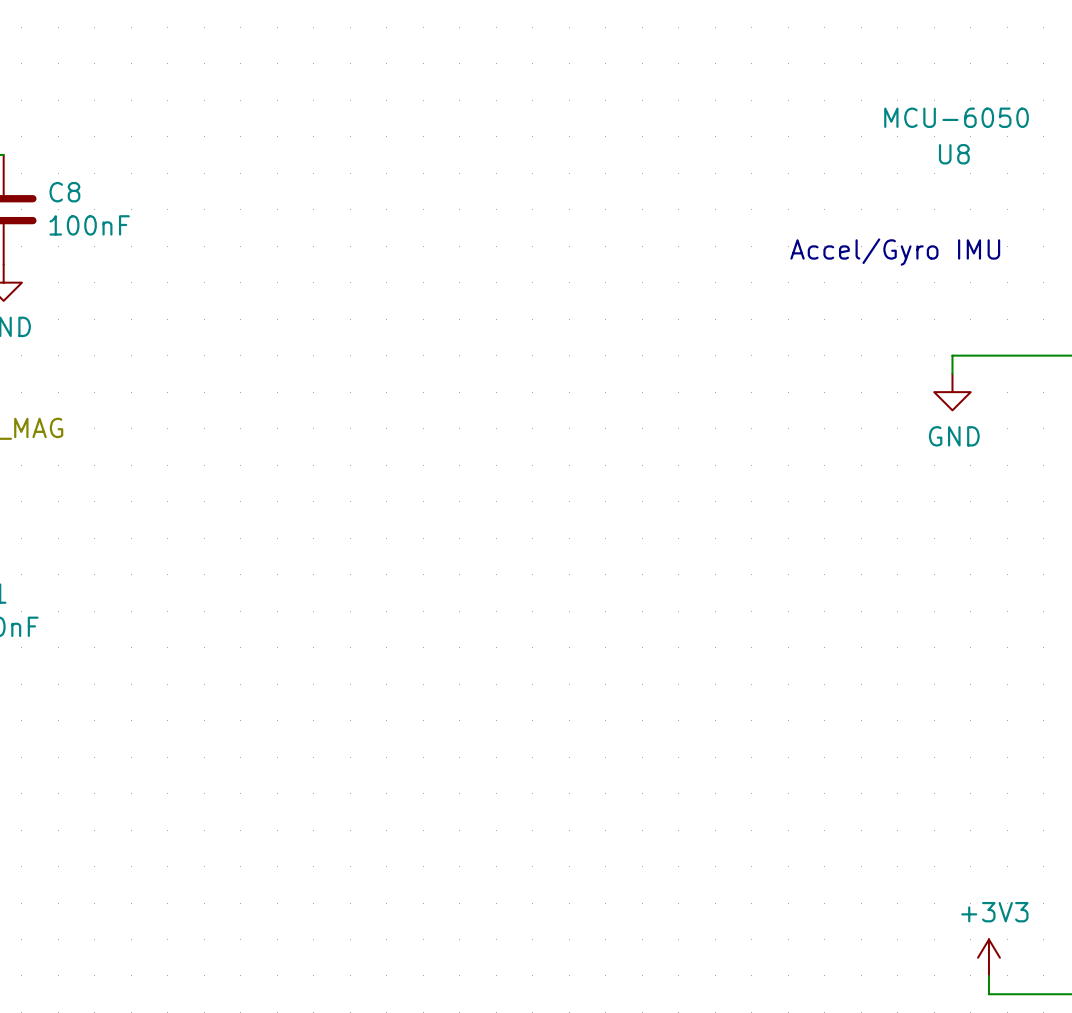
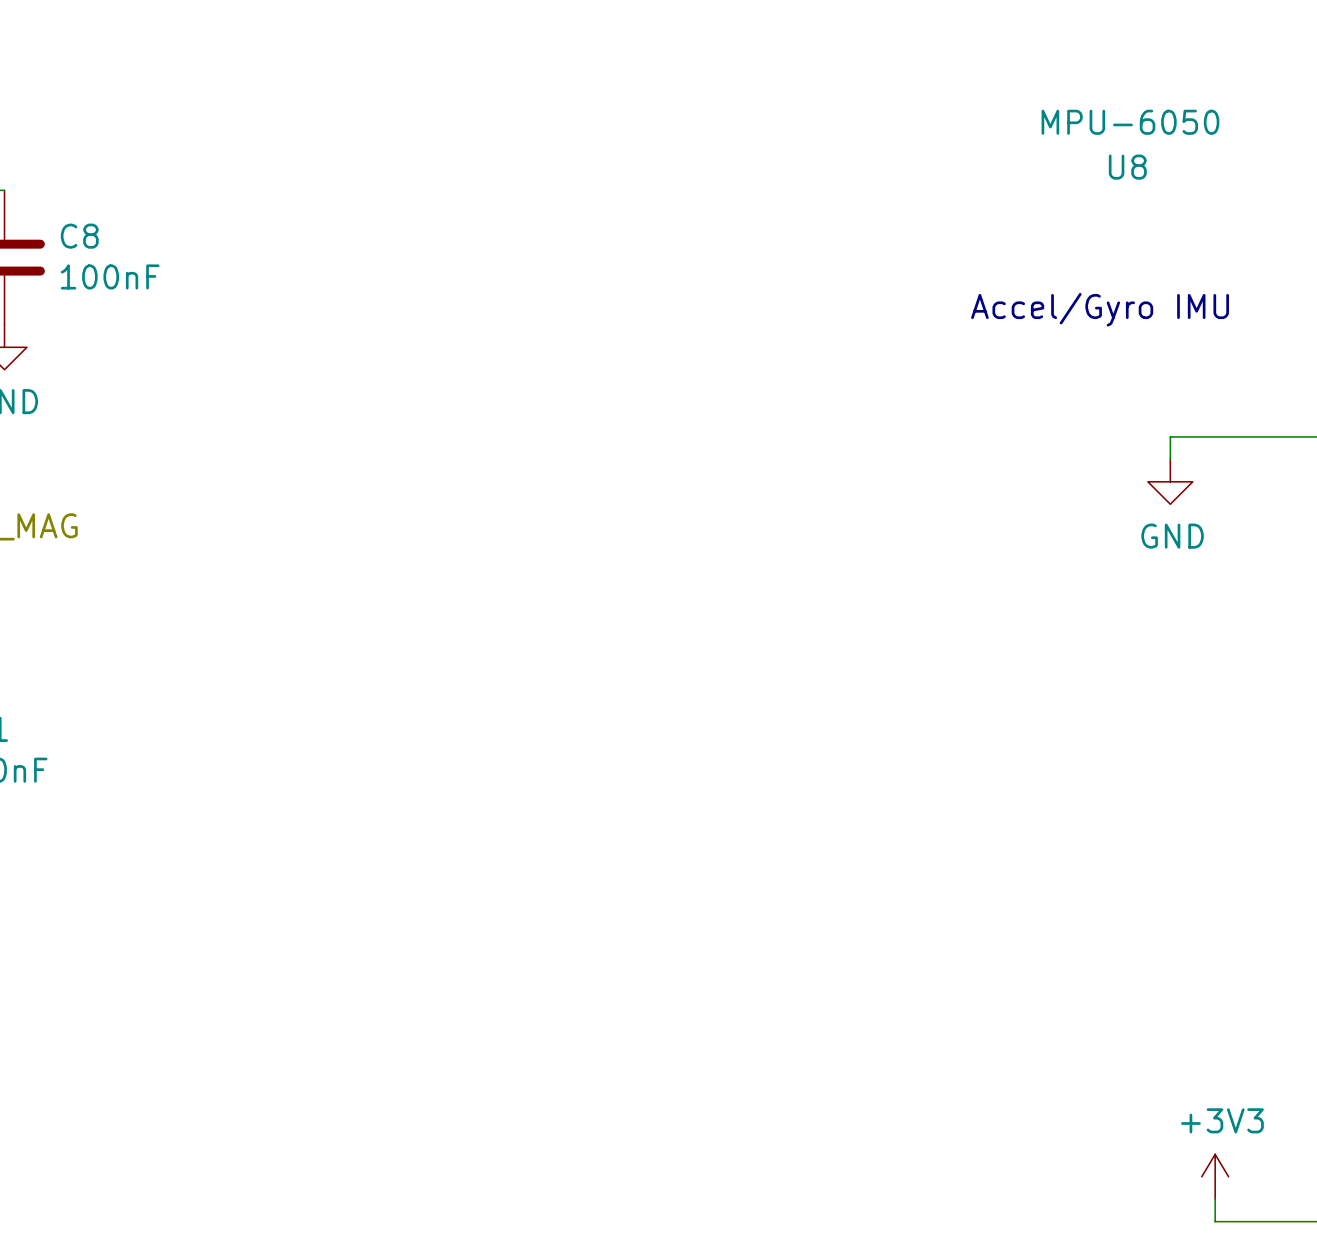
U8 value: MCU-6050 (956, 117) -> MPU-6050 (1130, 122)
U8 name position: U8 (954, 154) -> U8 (1127, 167)

